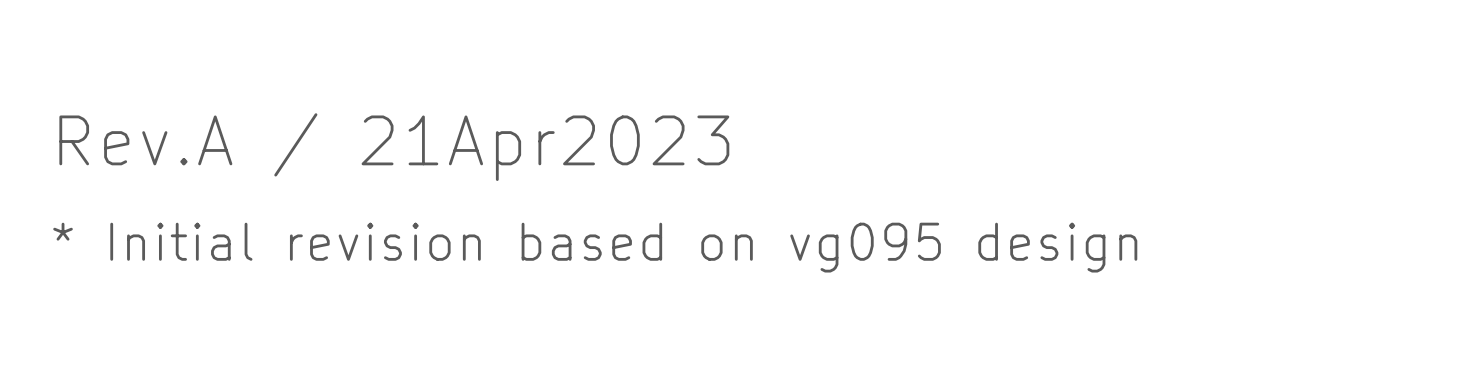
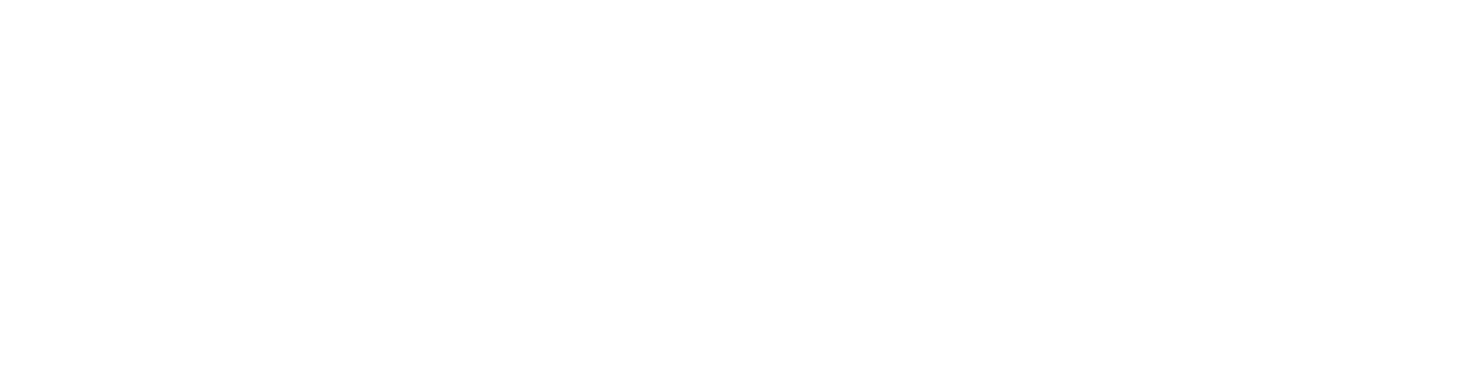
text: Rev.A / 21Apr2023 (394, 147) -> none
text: * Initial revision based on vg095 design (595, 247) -> none

